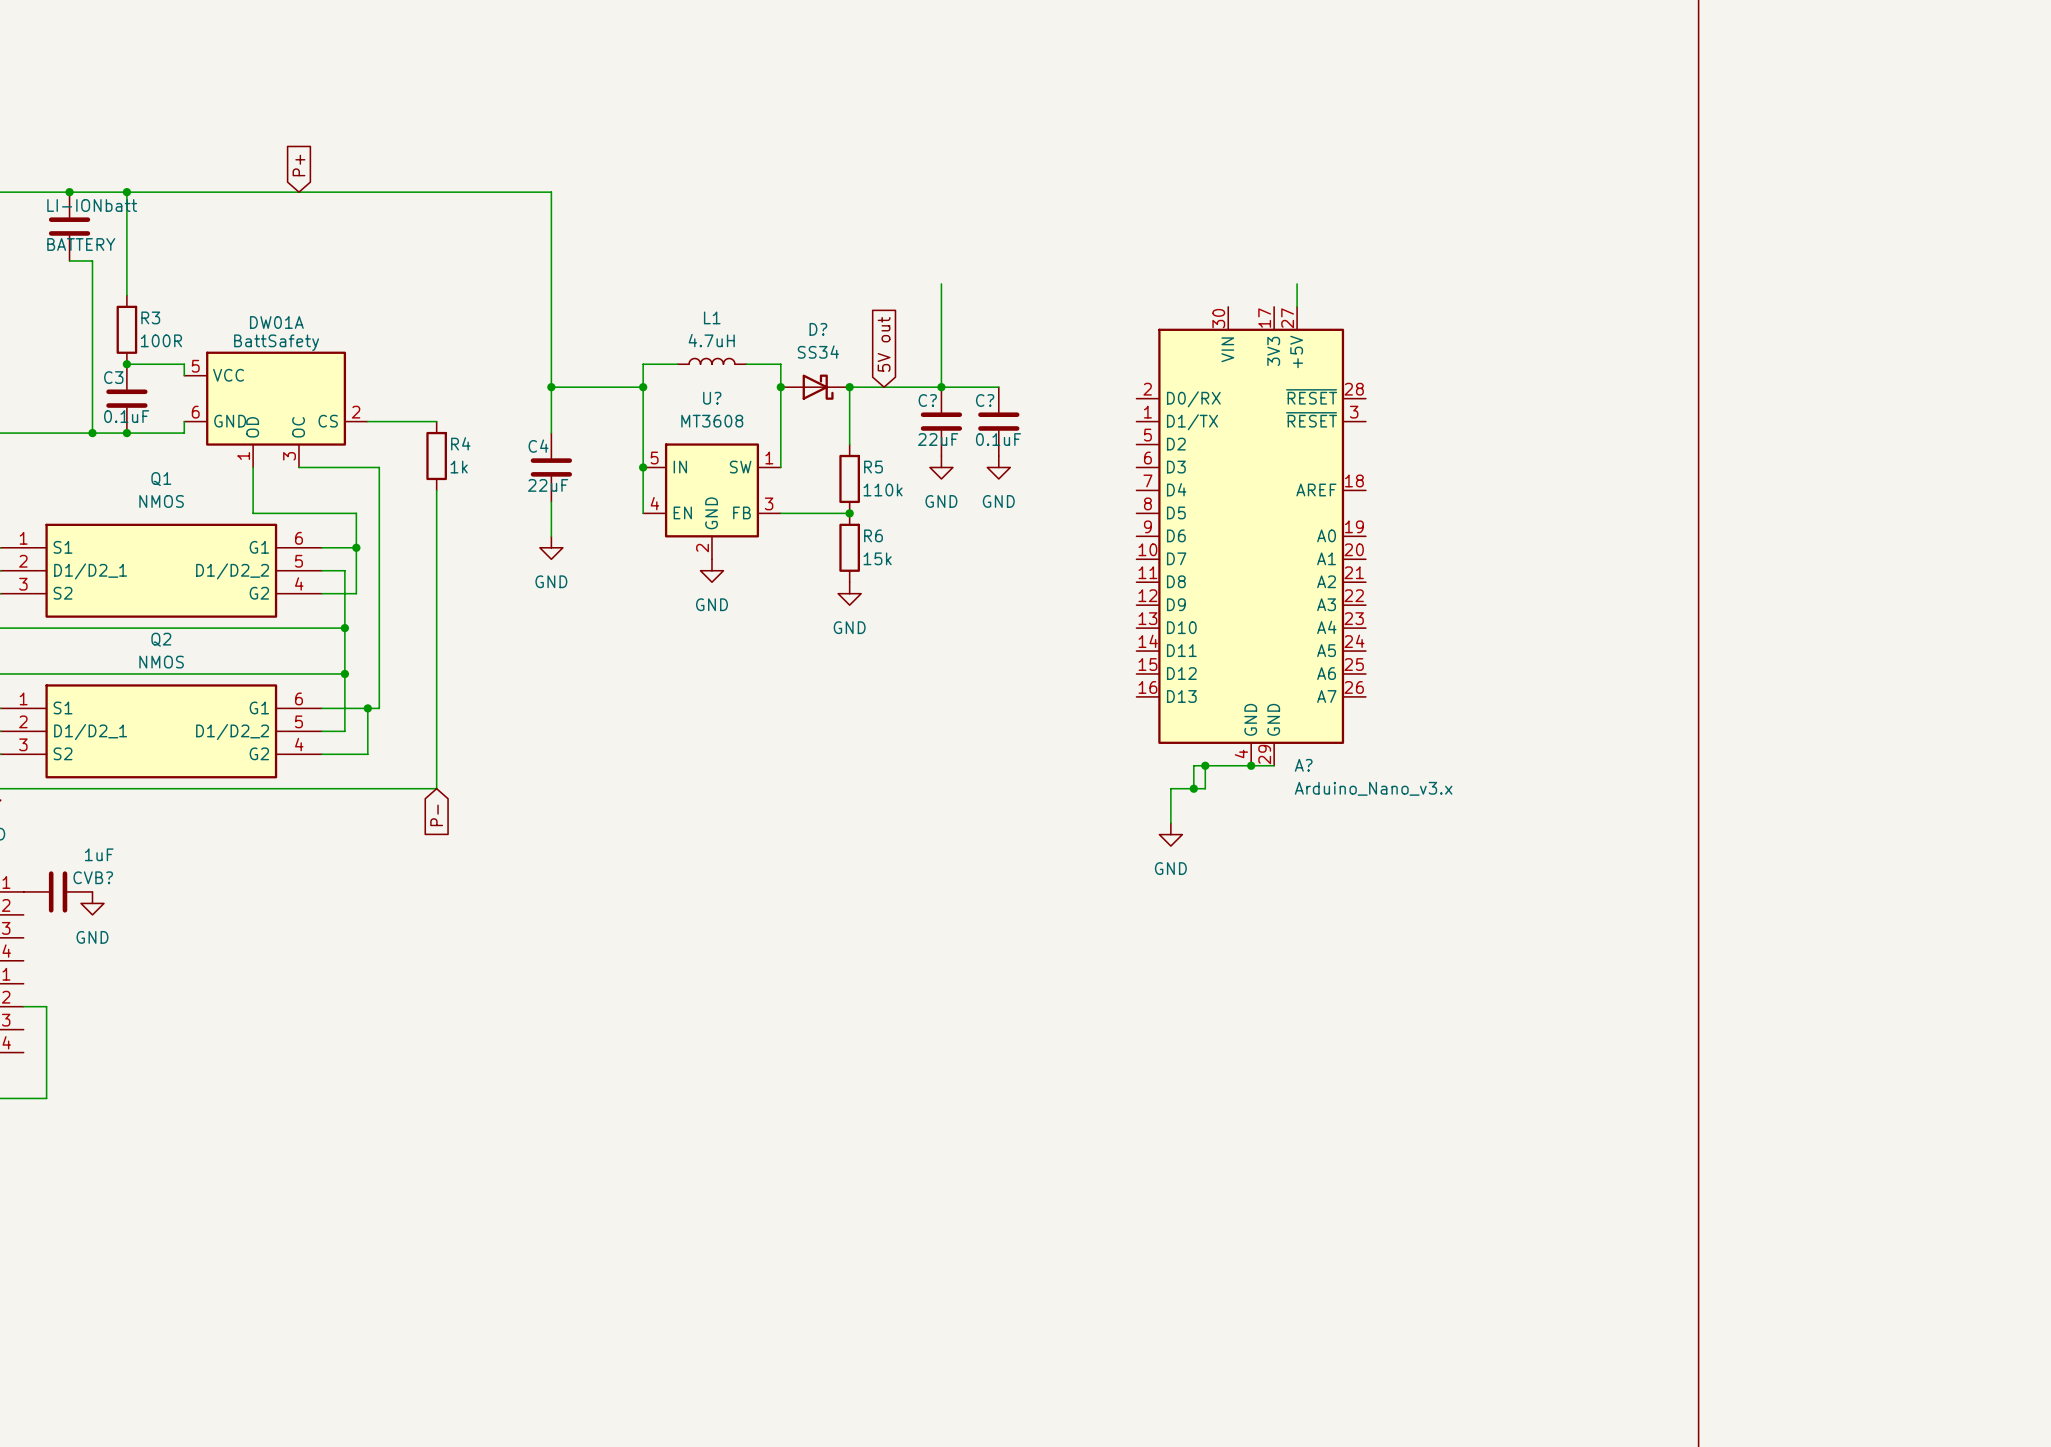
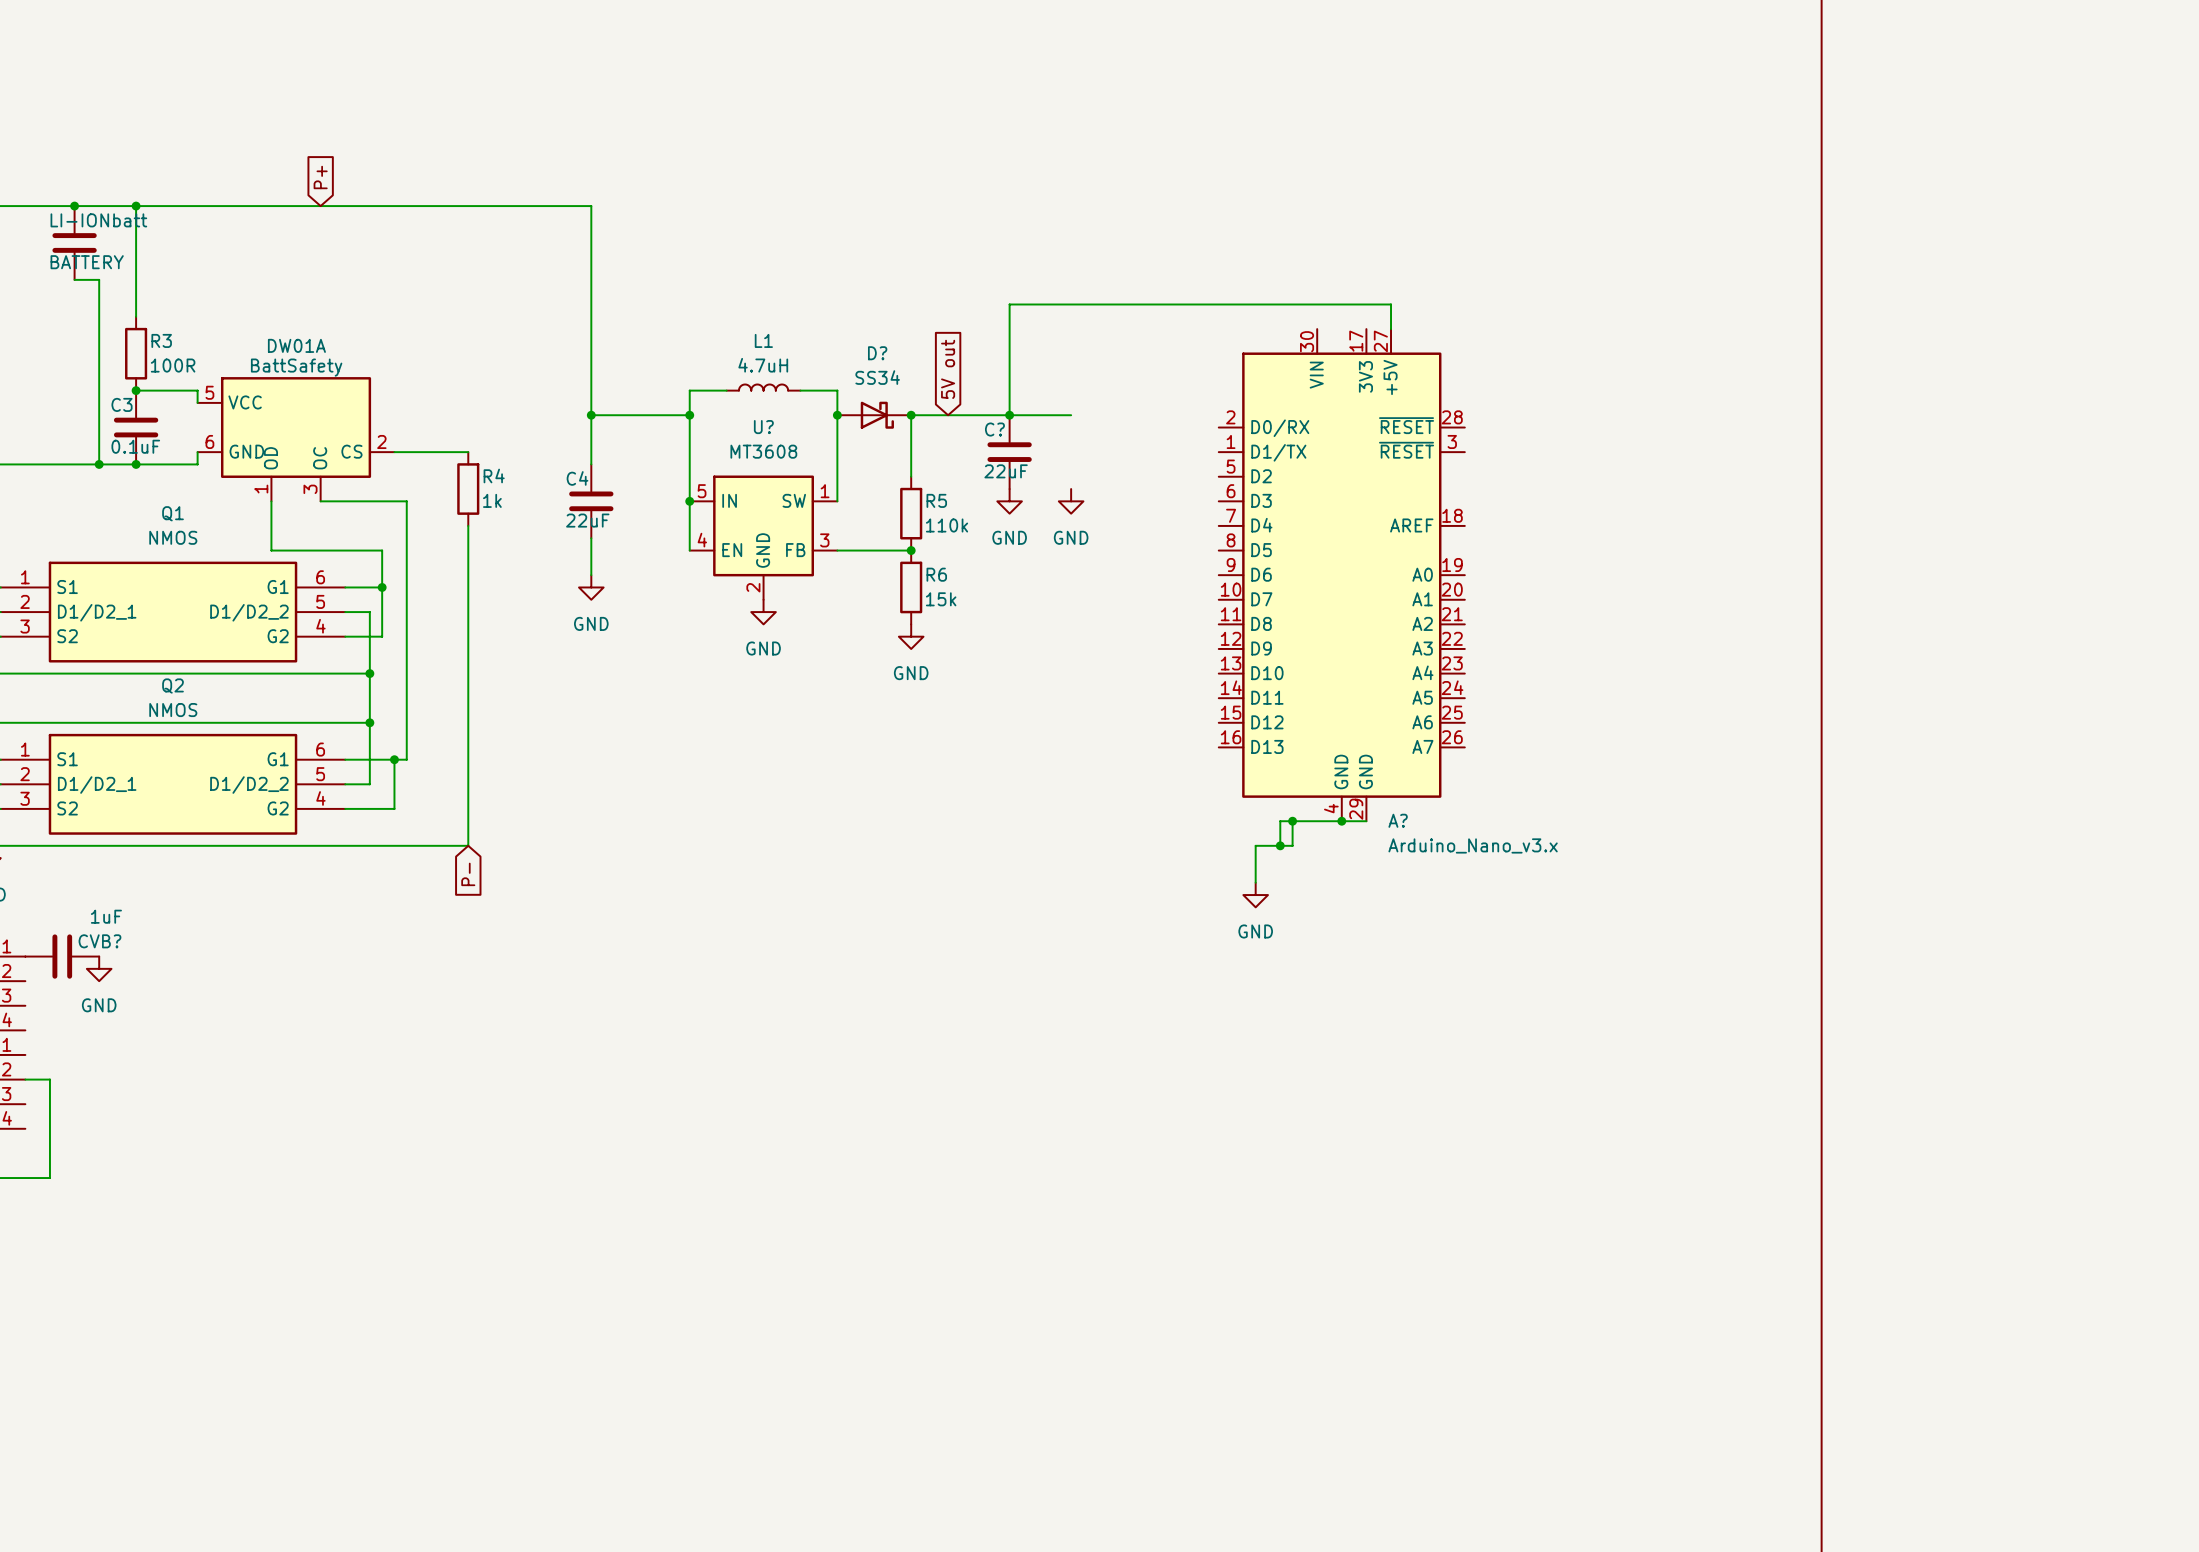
wire: none -> (1009, 304) (1391, 304)
C?: 0.1uF (998, 421) -> none

